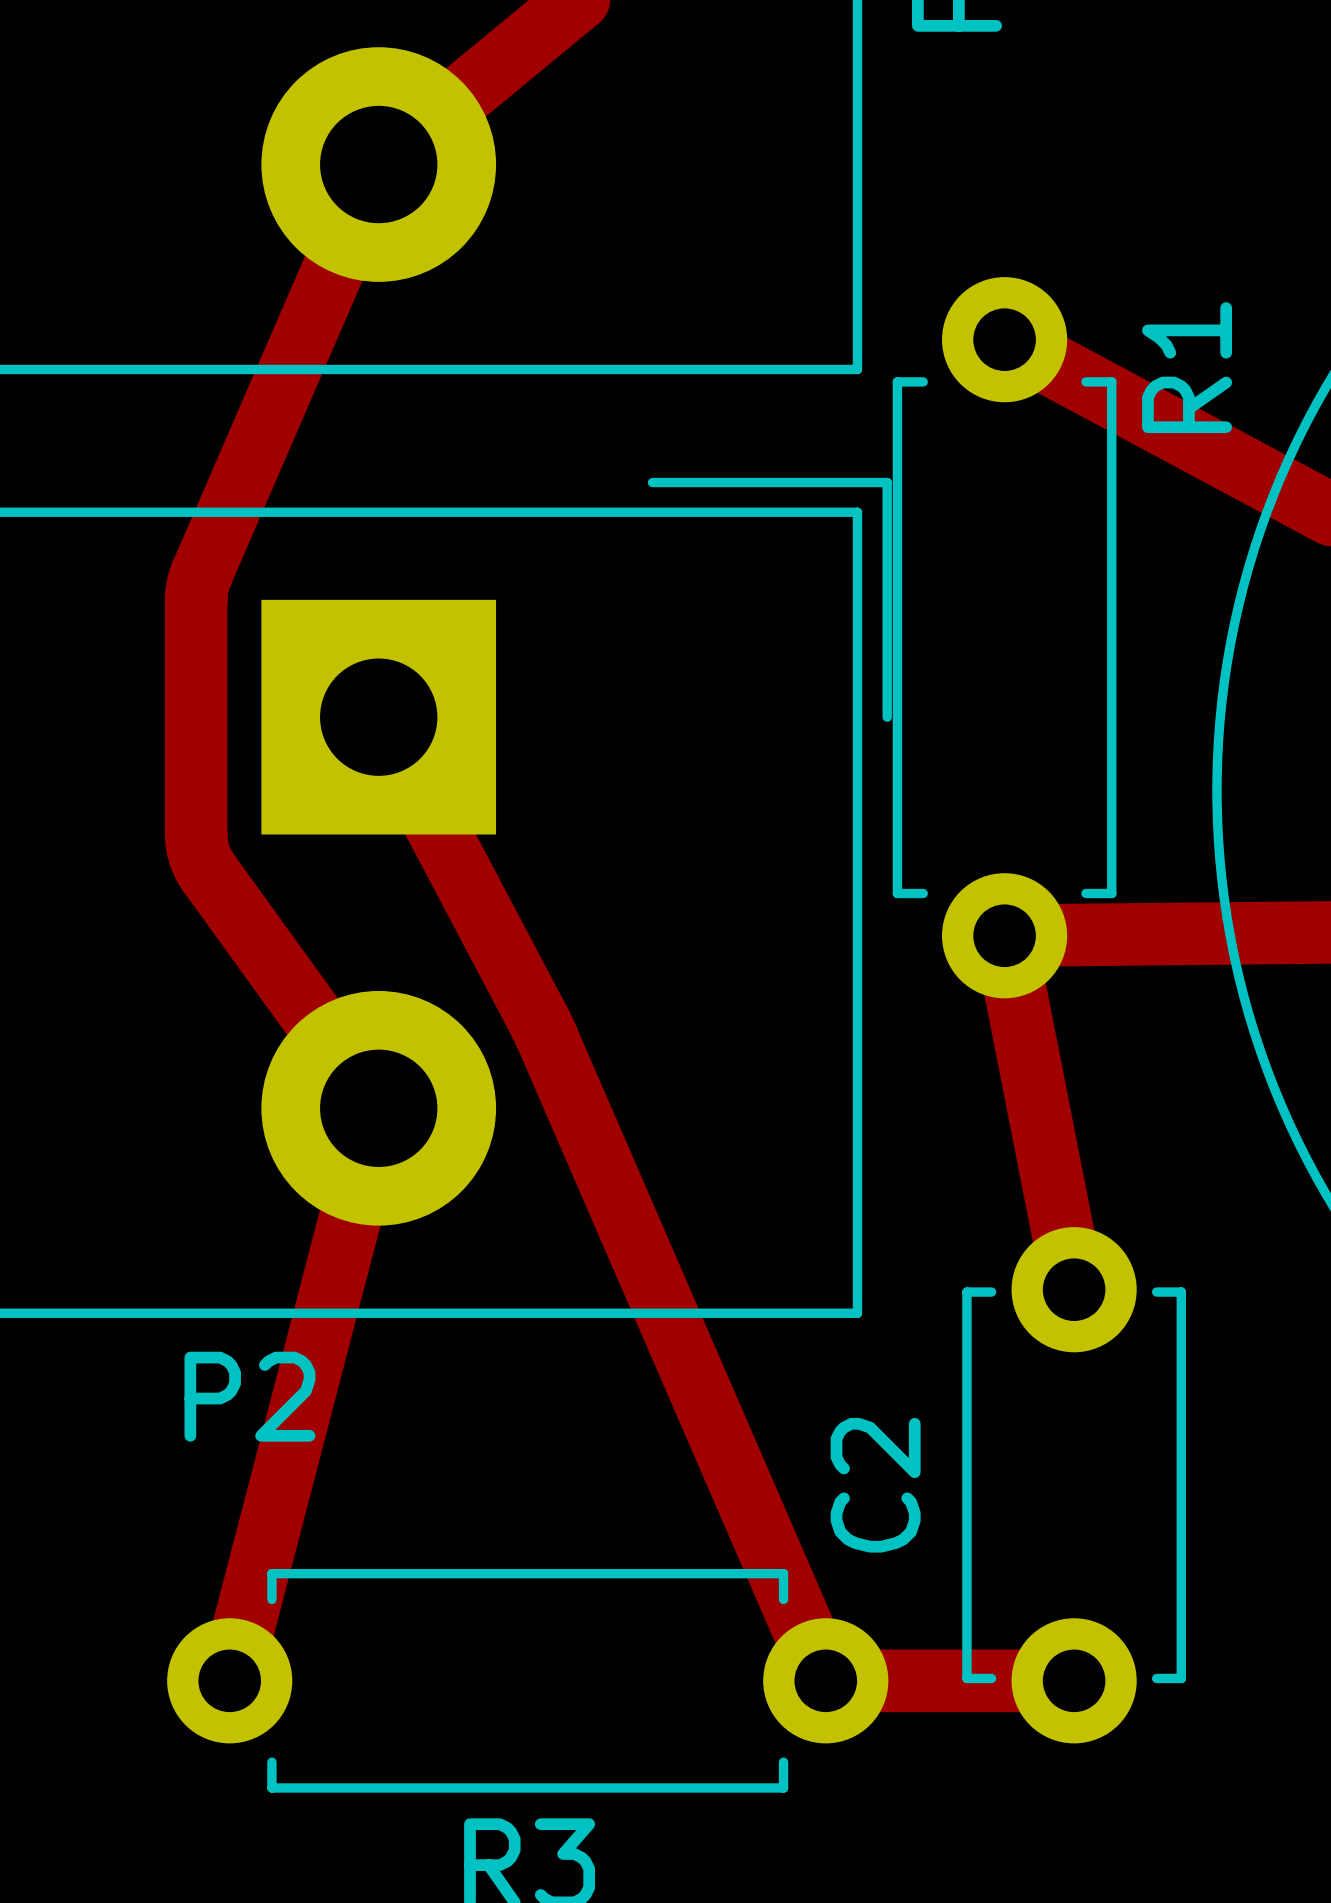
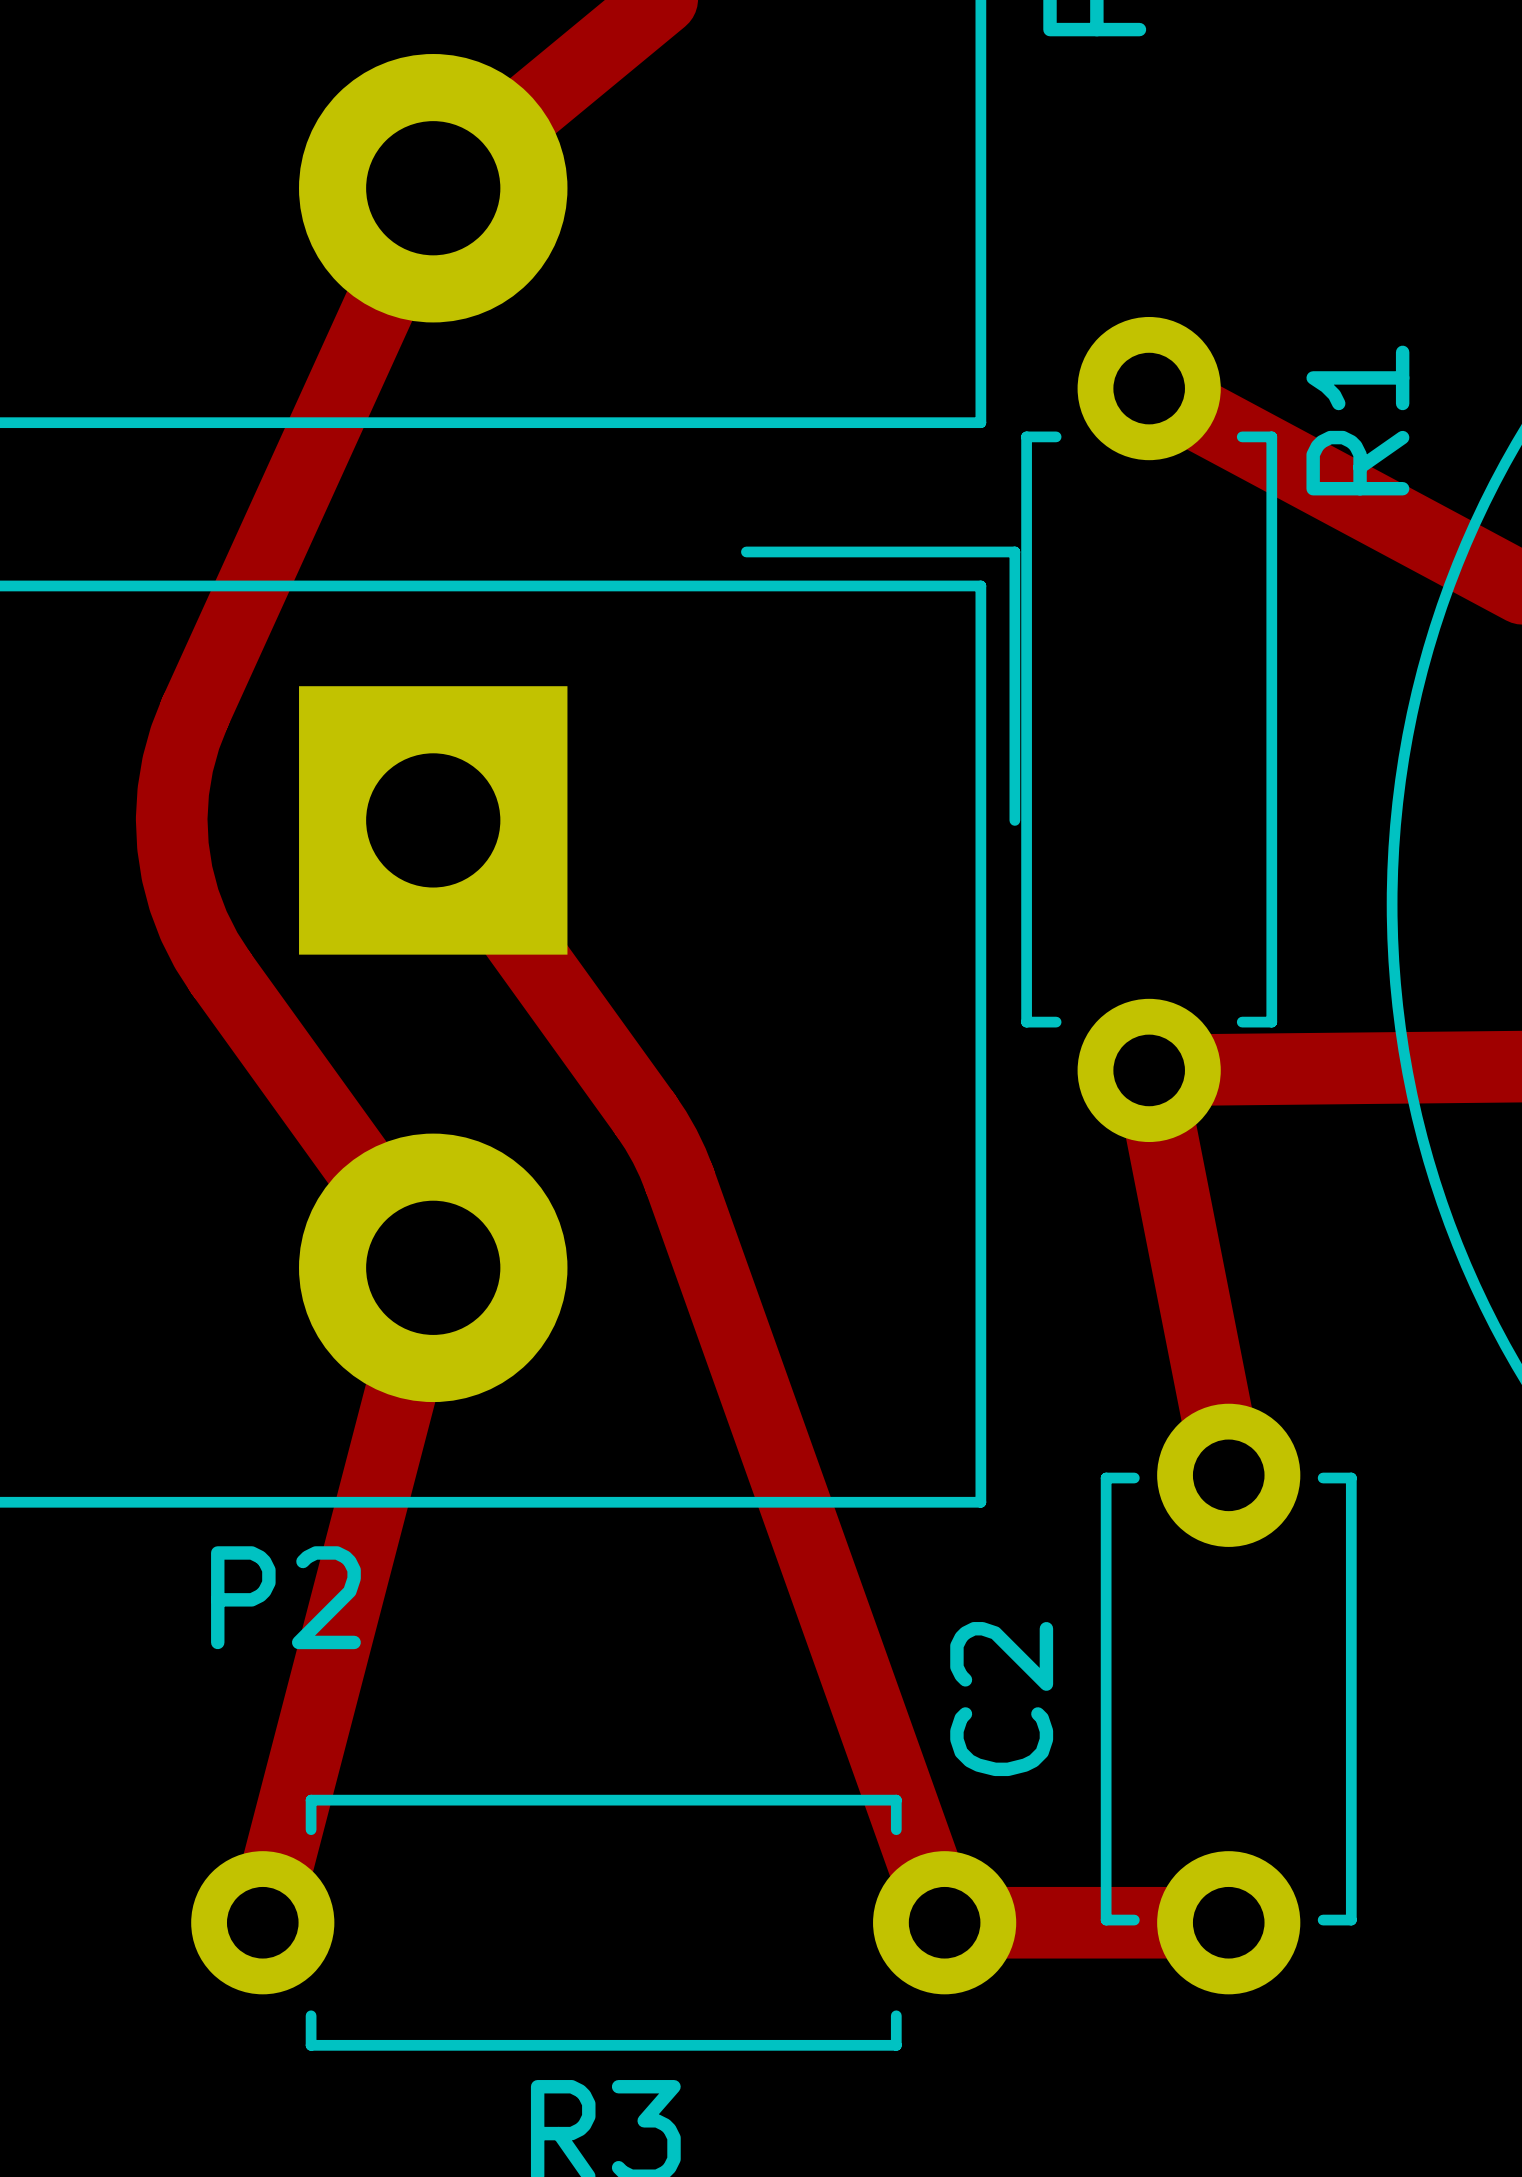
track: (378, 164) (201, 573) (196, 599) (196, 834) (199, 854) (208, 872) (378, 1108) -> (433, 188) (195, 712) (177, 764) (171, 818) (177, 873) (193, 925) (206, 950) (433, 1267)
track: (378, 717) (546, 1035) (825, 1680) -> (433, 820) (645, 1114) (672, 1162) (944, 1922)

